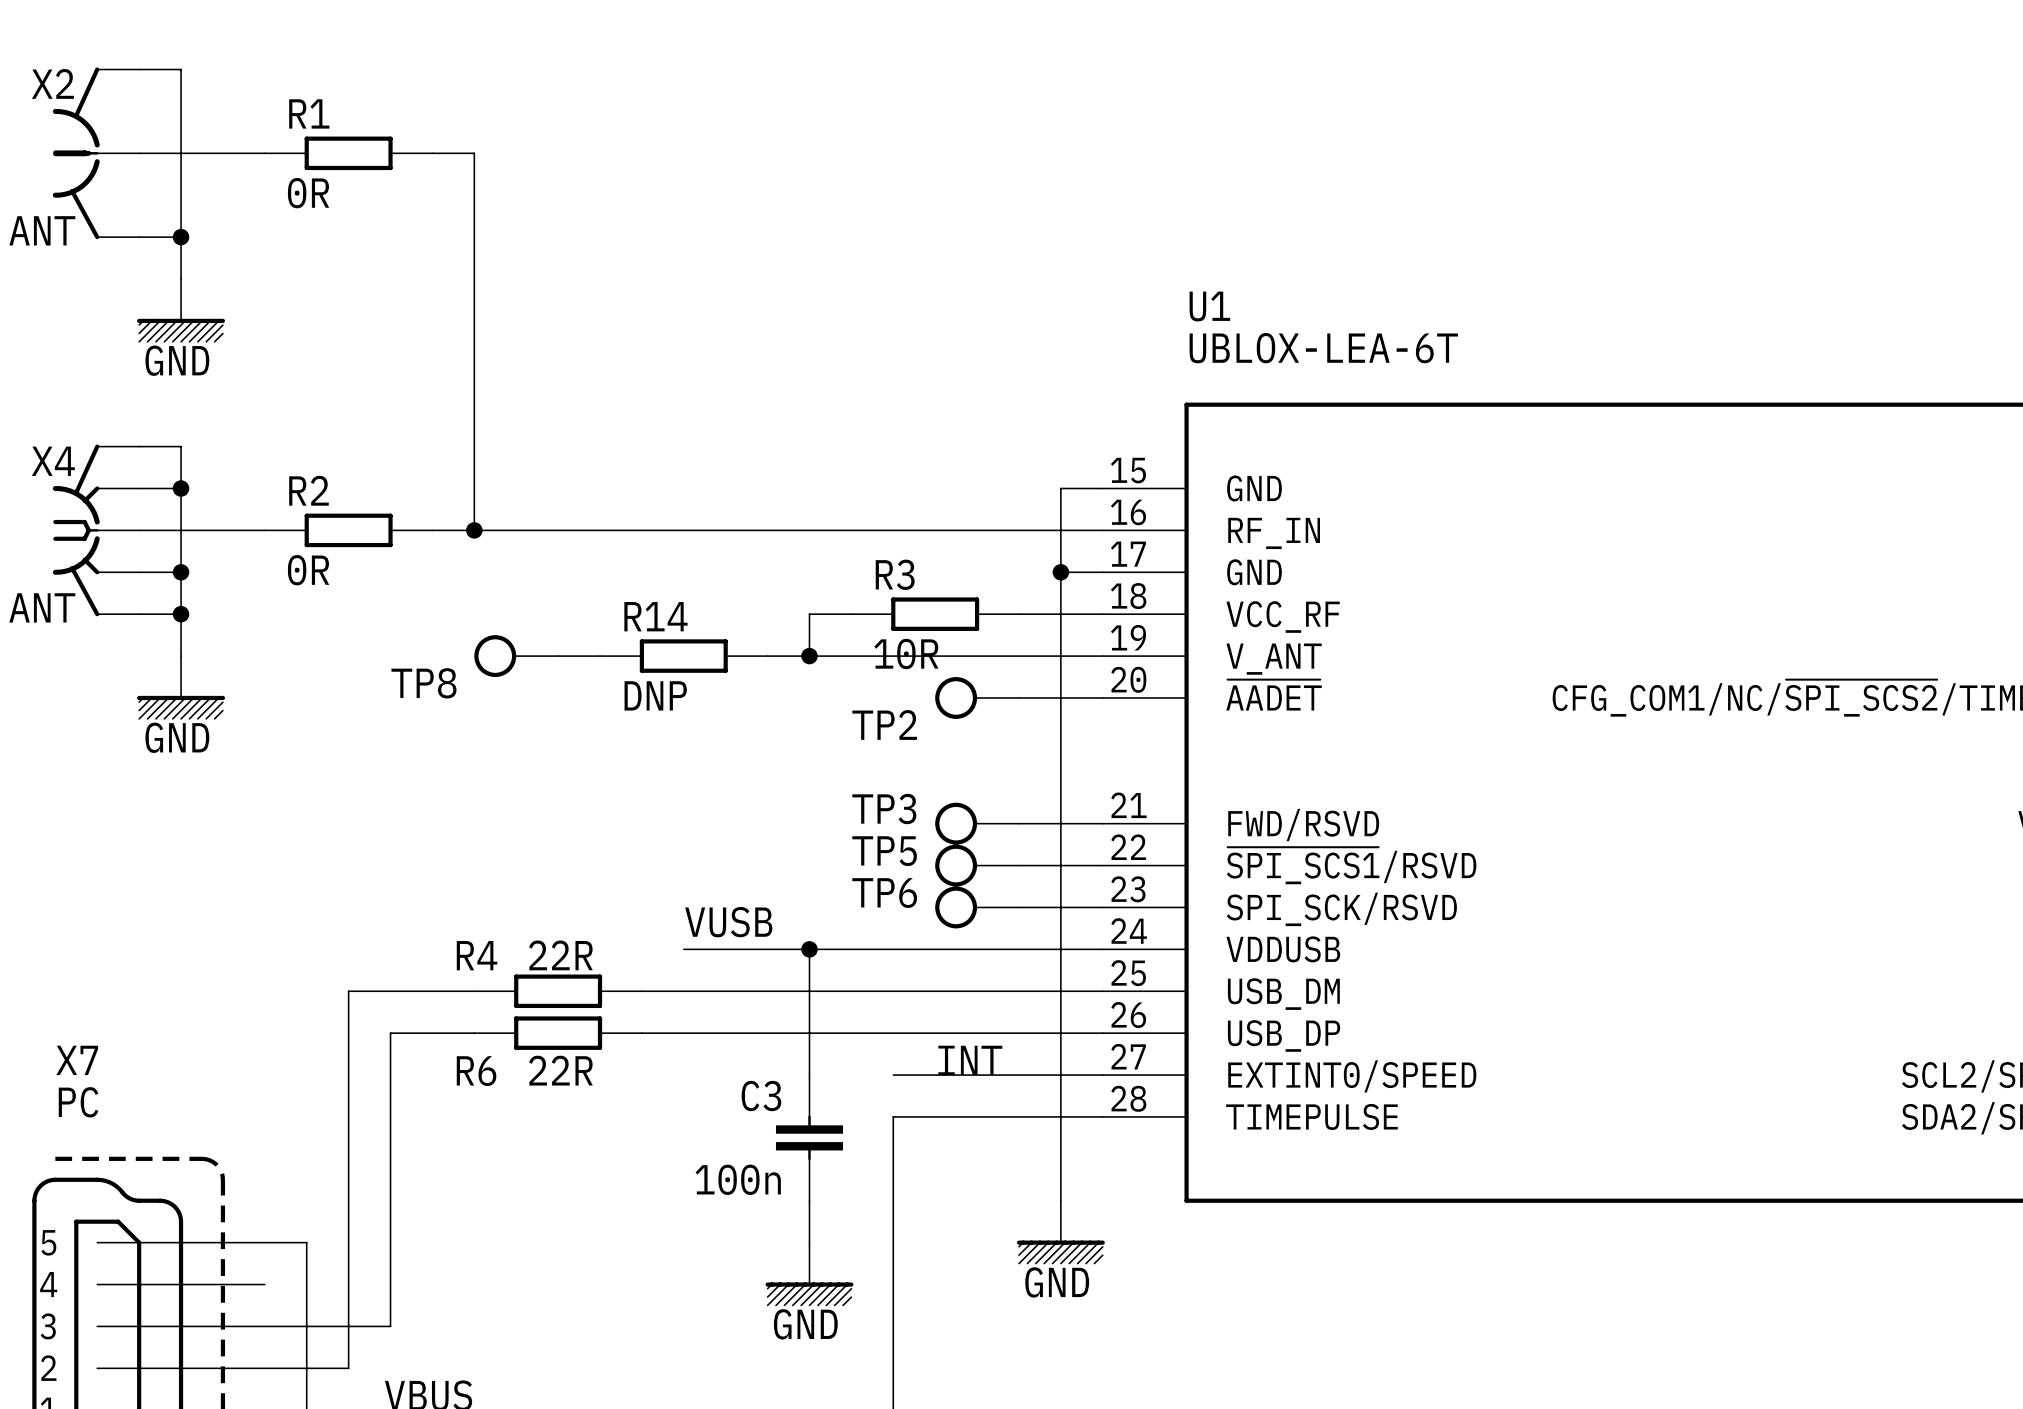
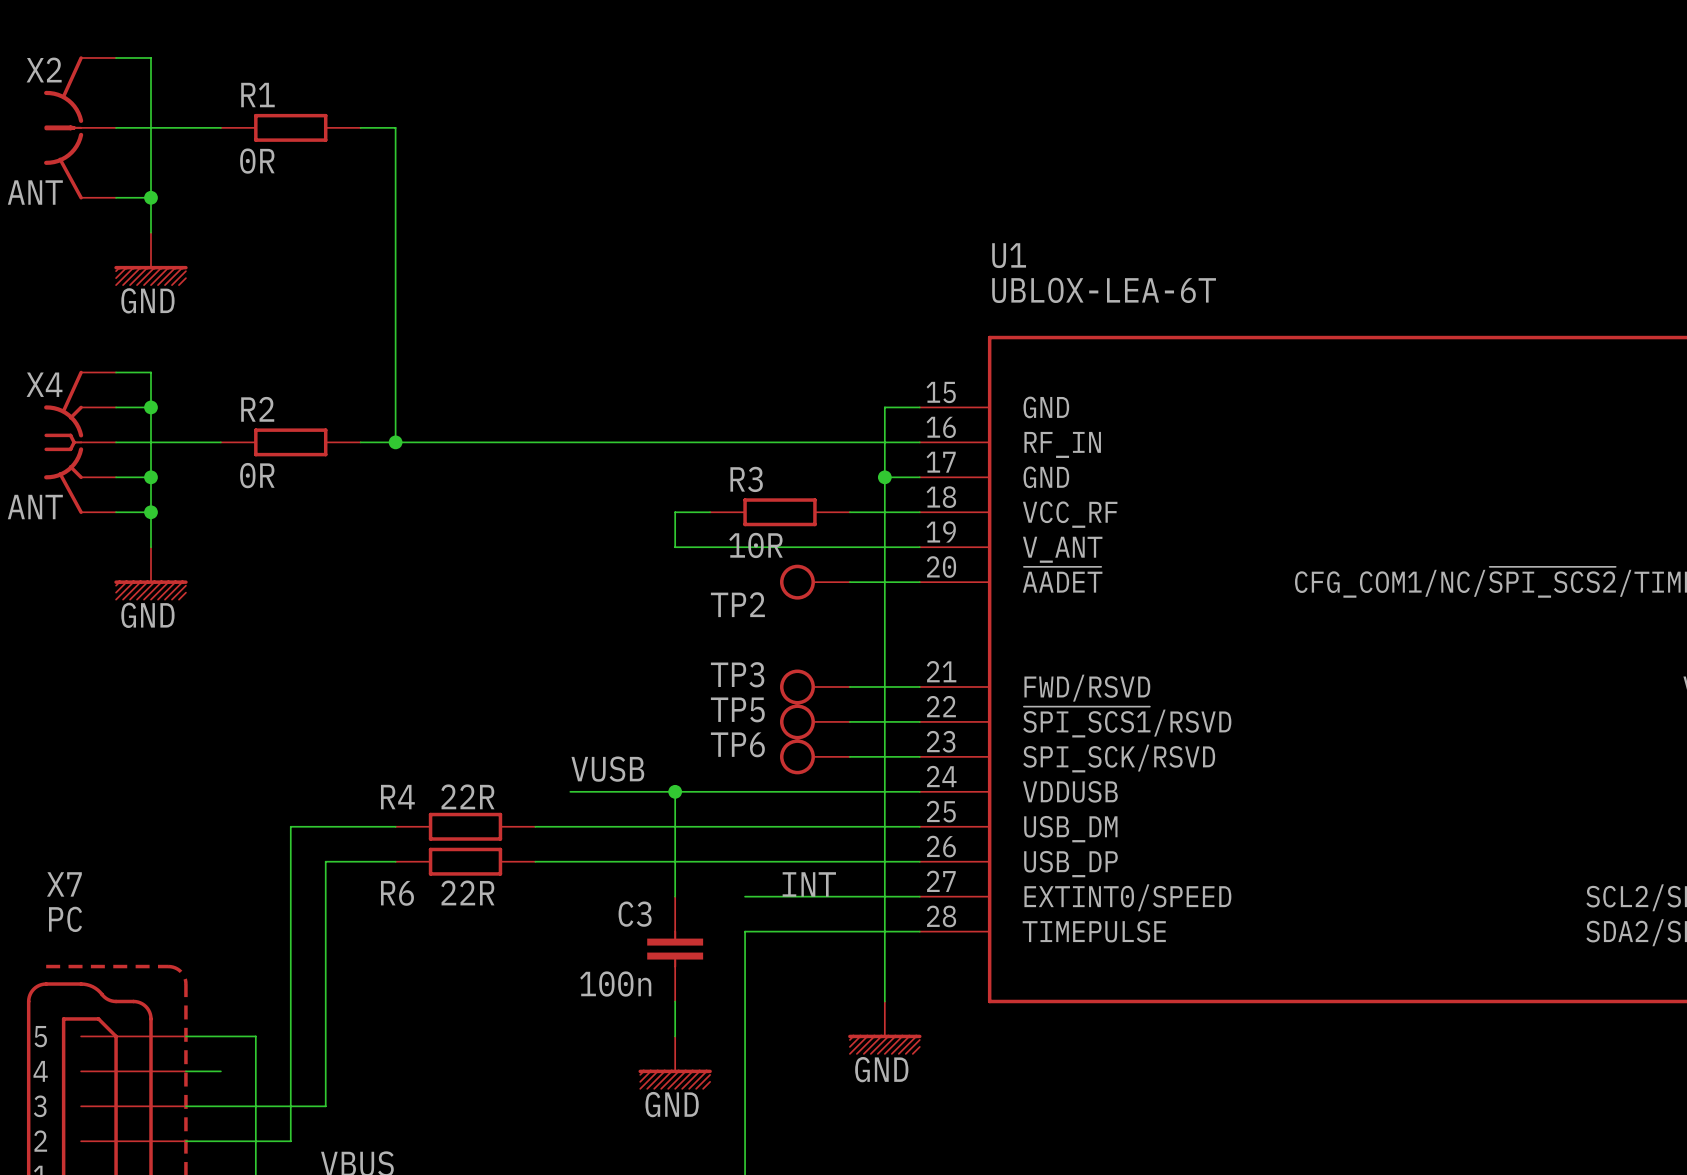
TP8: (516, 656) -> none
wire: (558, 656) (600, 656) -> none
R14: DNP (683, 656) -> none
wire: (767, 656) (809, 656) -> none
junction: (809, 656) -> none

